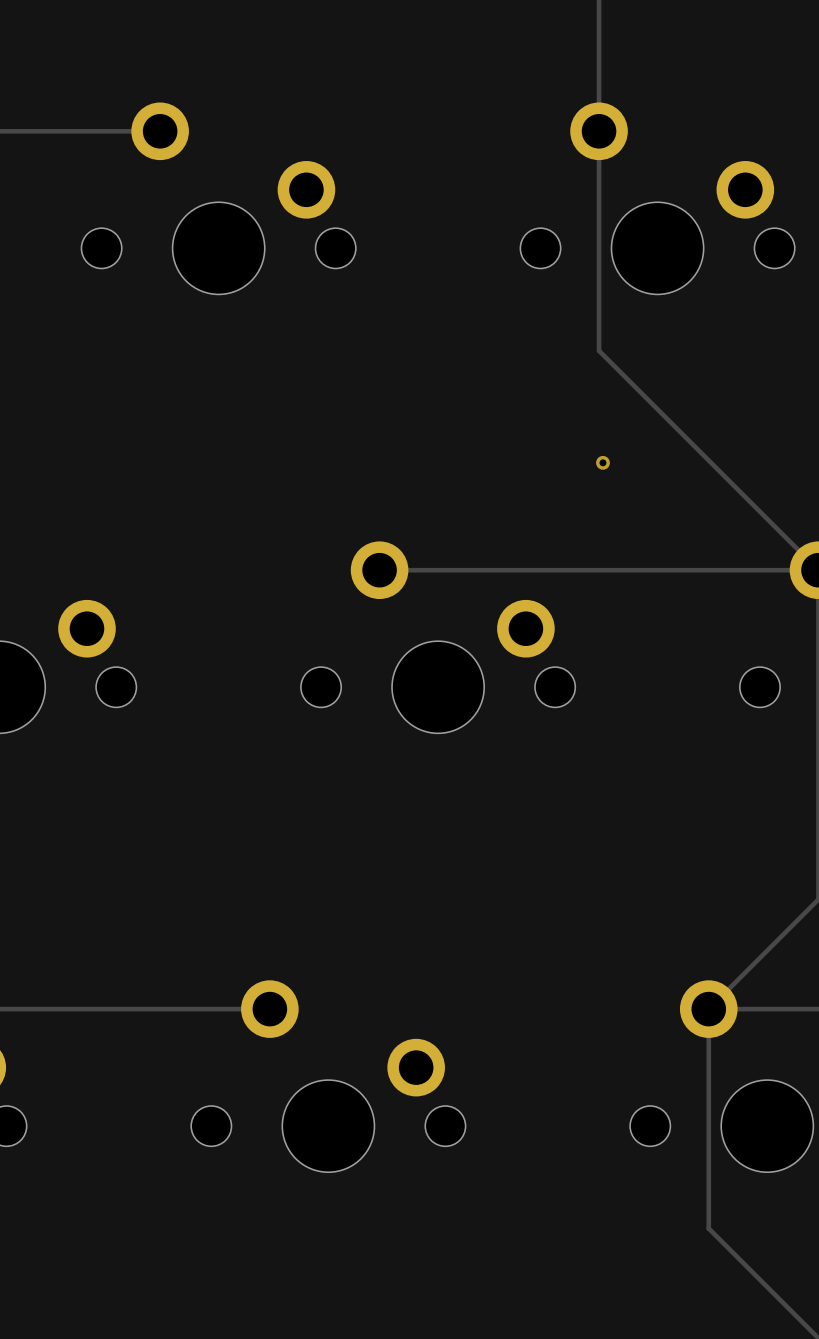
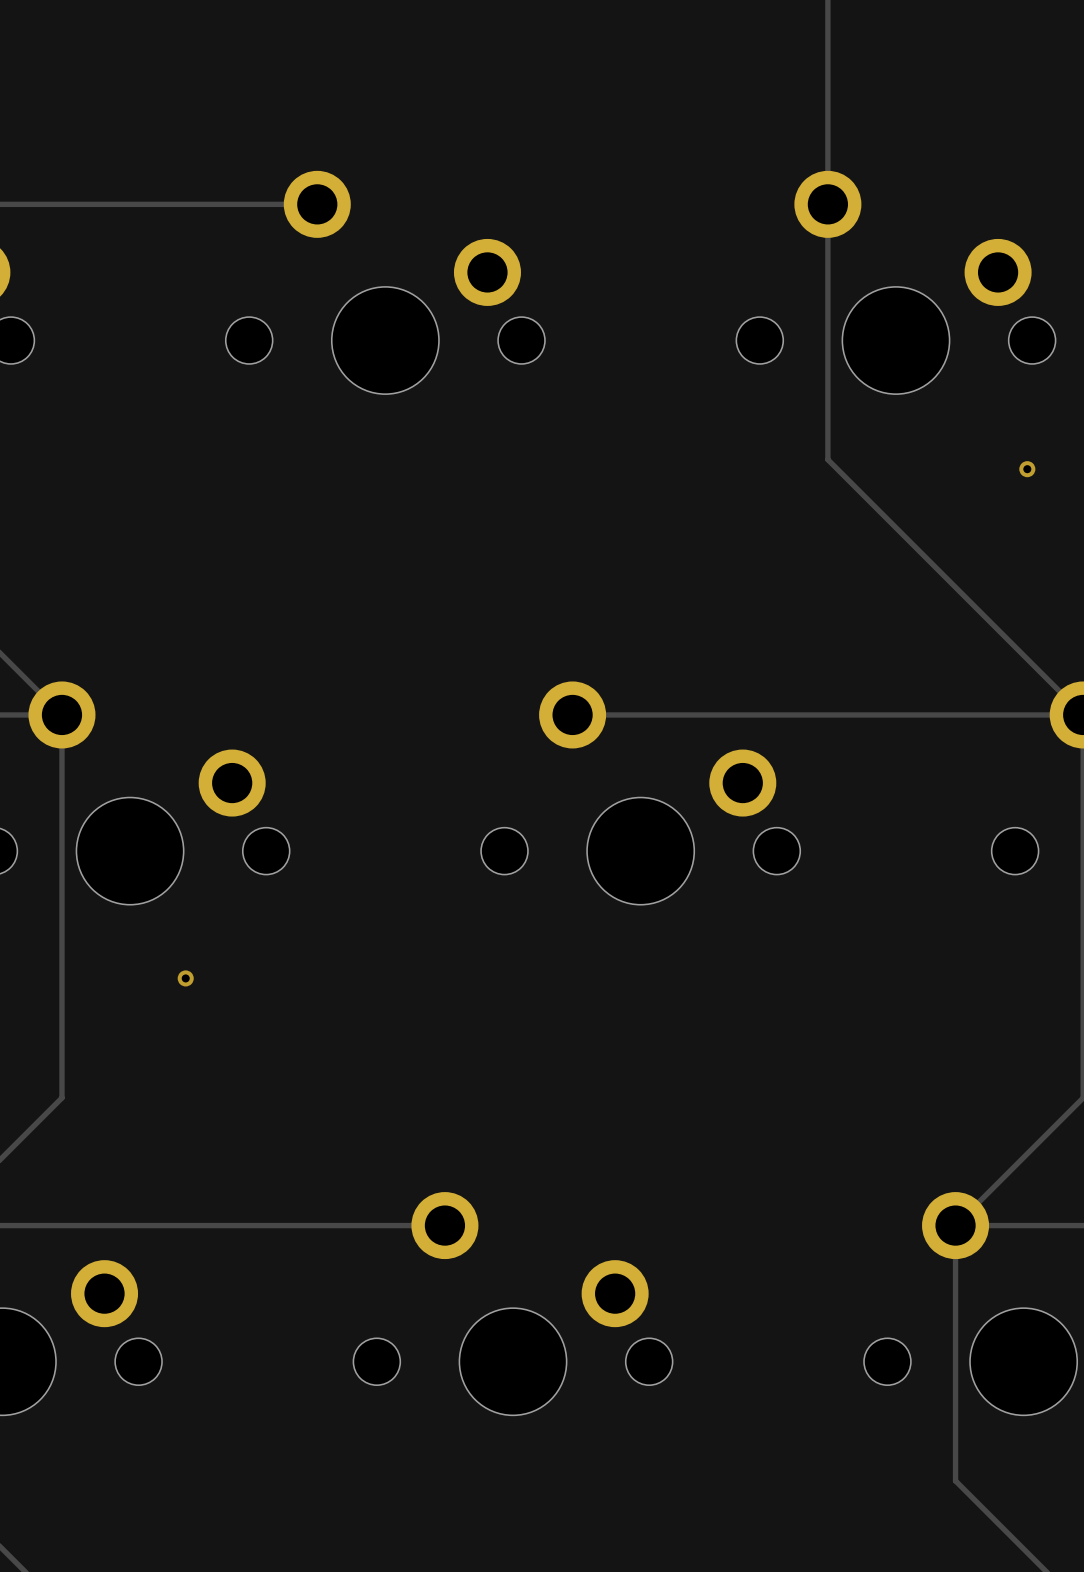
via: none -> (1027, 469)
via: (602, 462) -> none
via: none -> (185, 978)

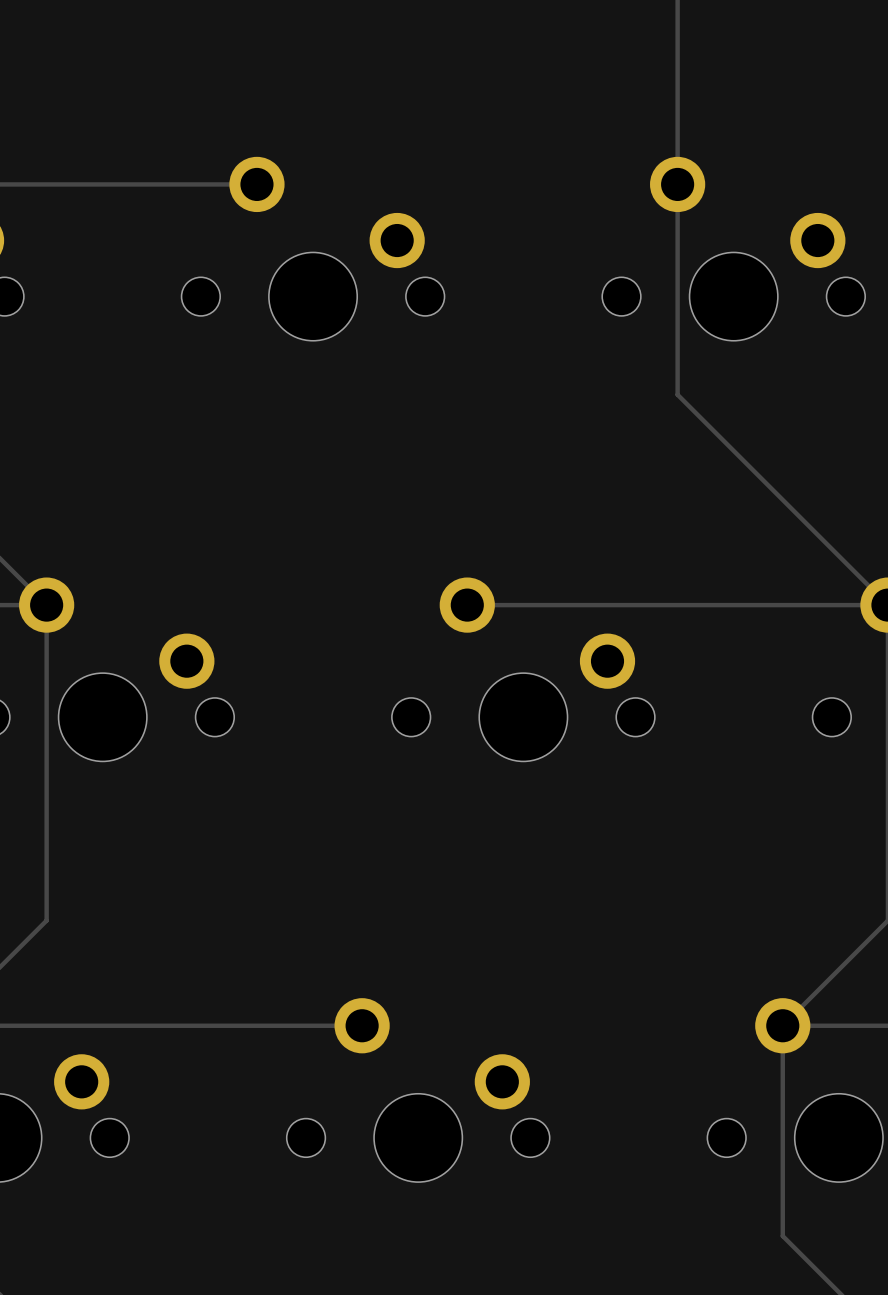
via: (1027, 469) -> none
via: (185, 978) -> none

